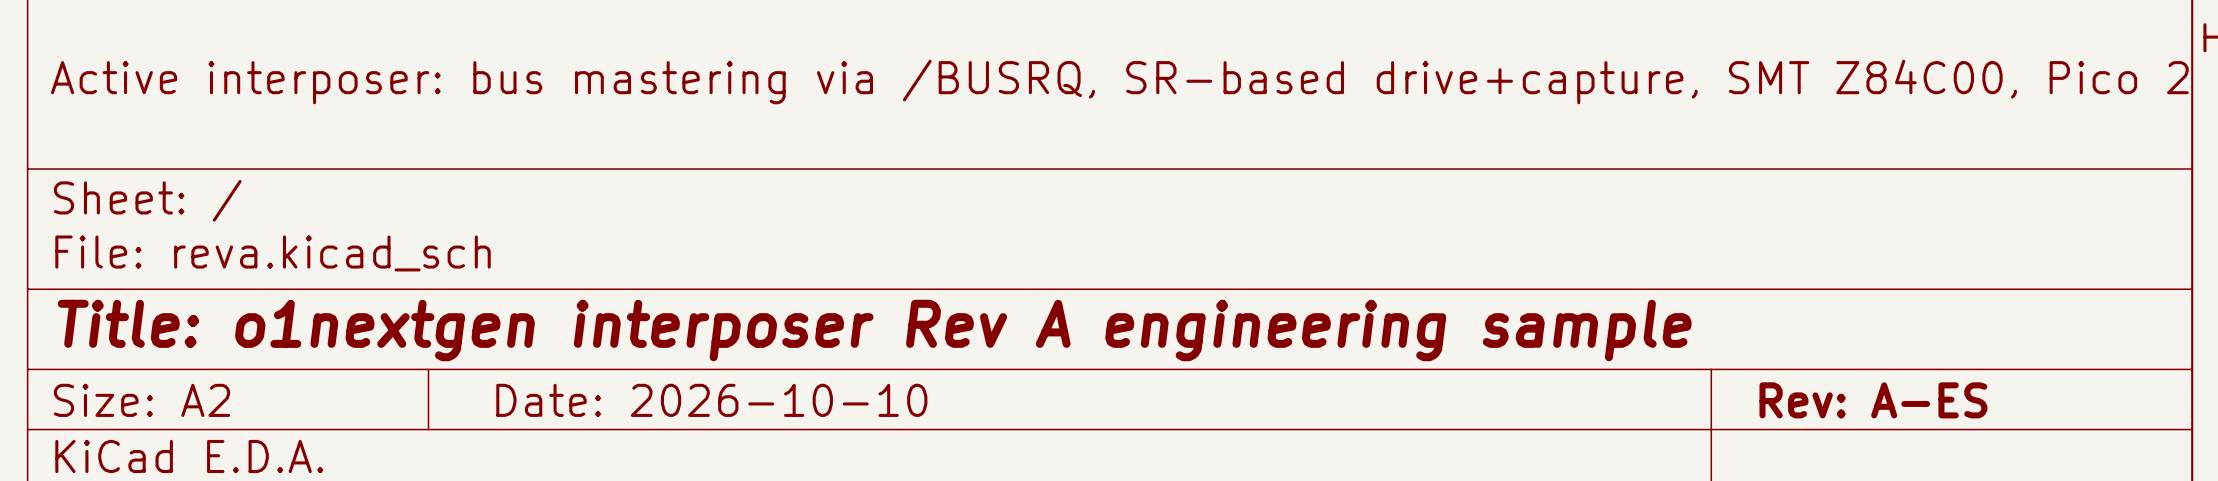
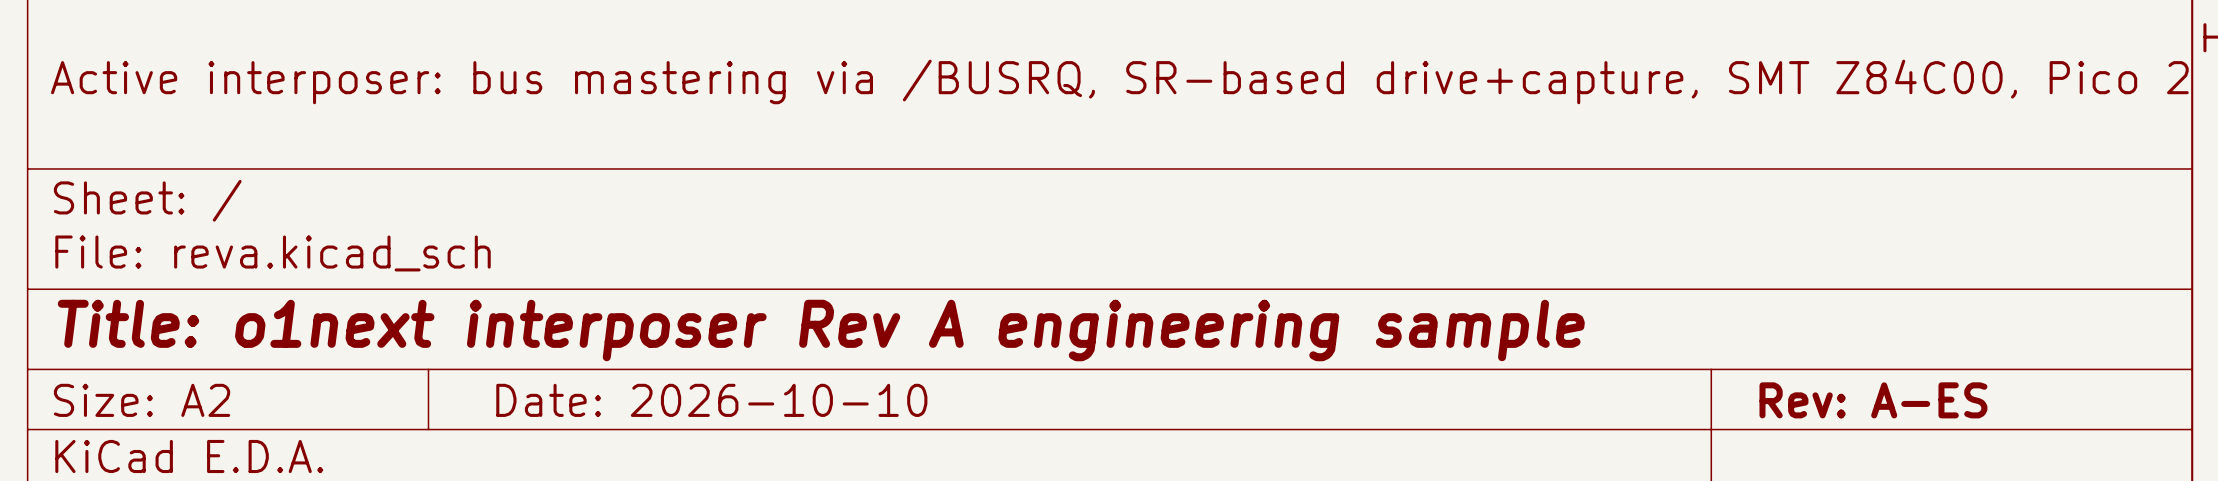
title block: Title: o1nextgen interposer Rev A engineering sample (874, 330) -> Title: o1next interposer Rev A engineering sample (821, 330)

